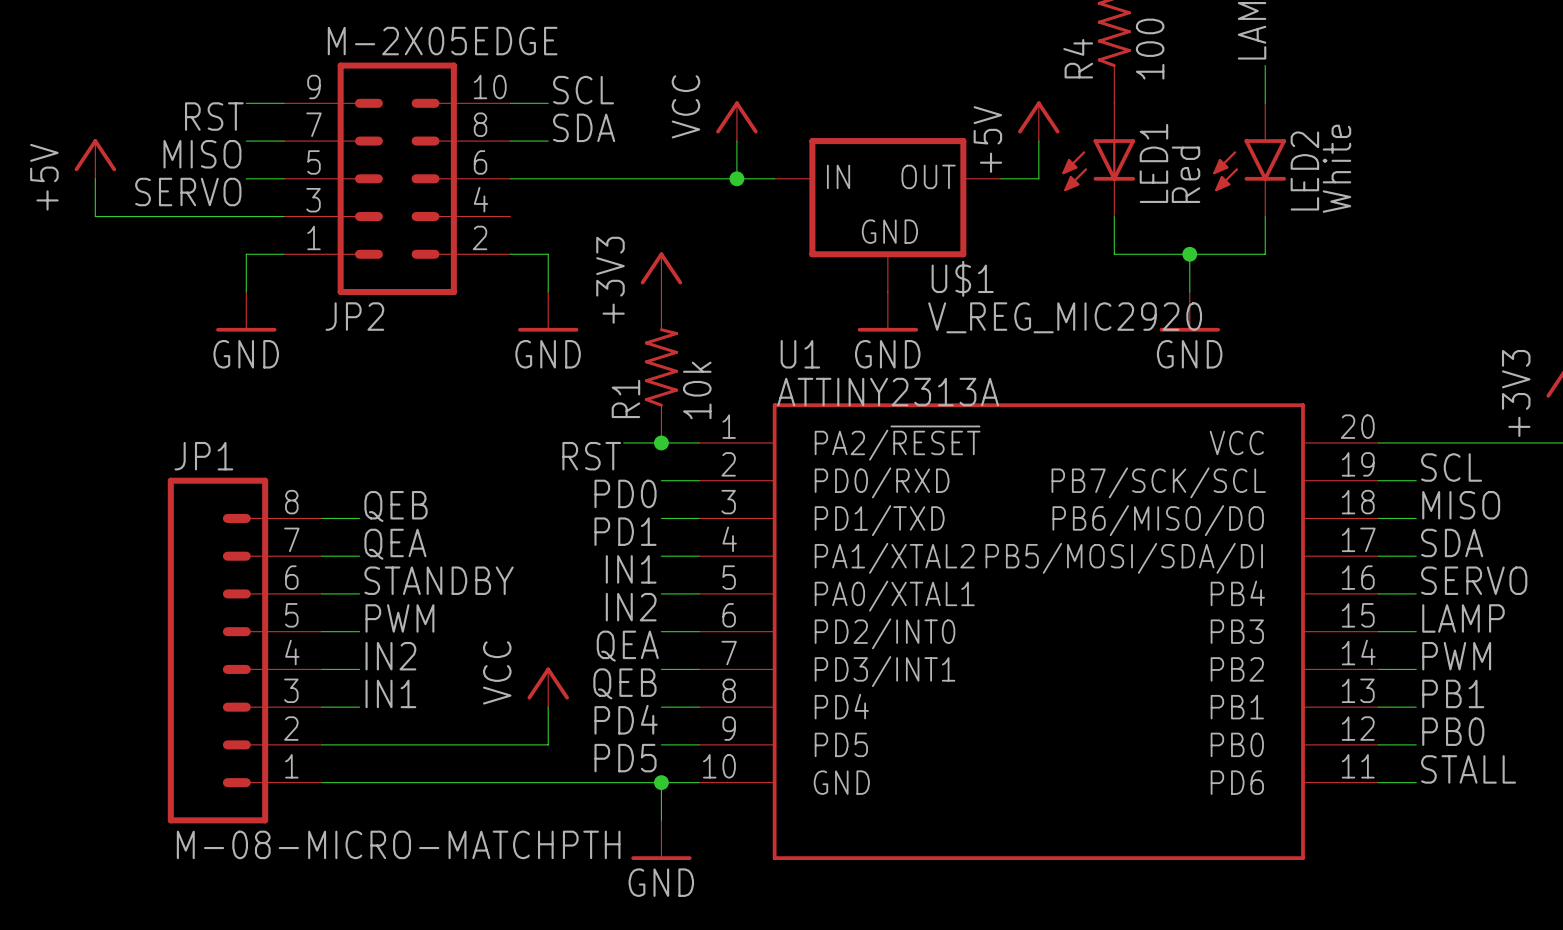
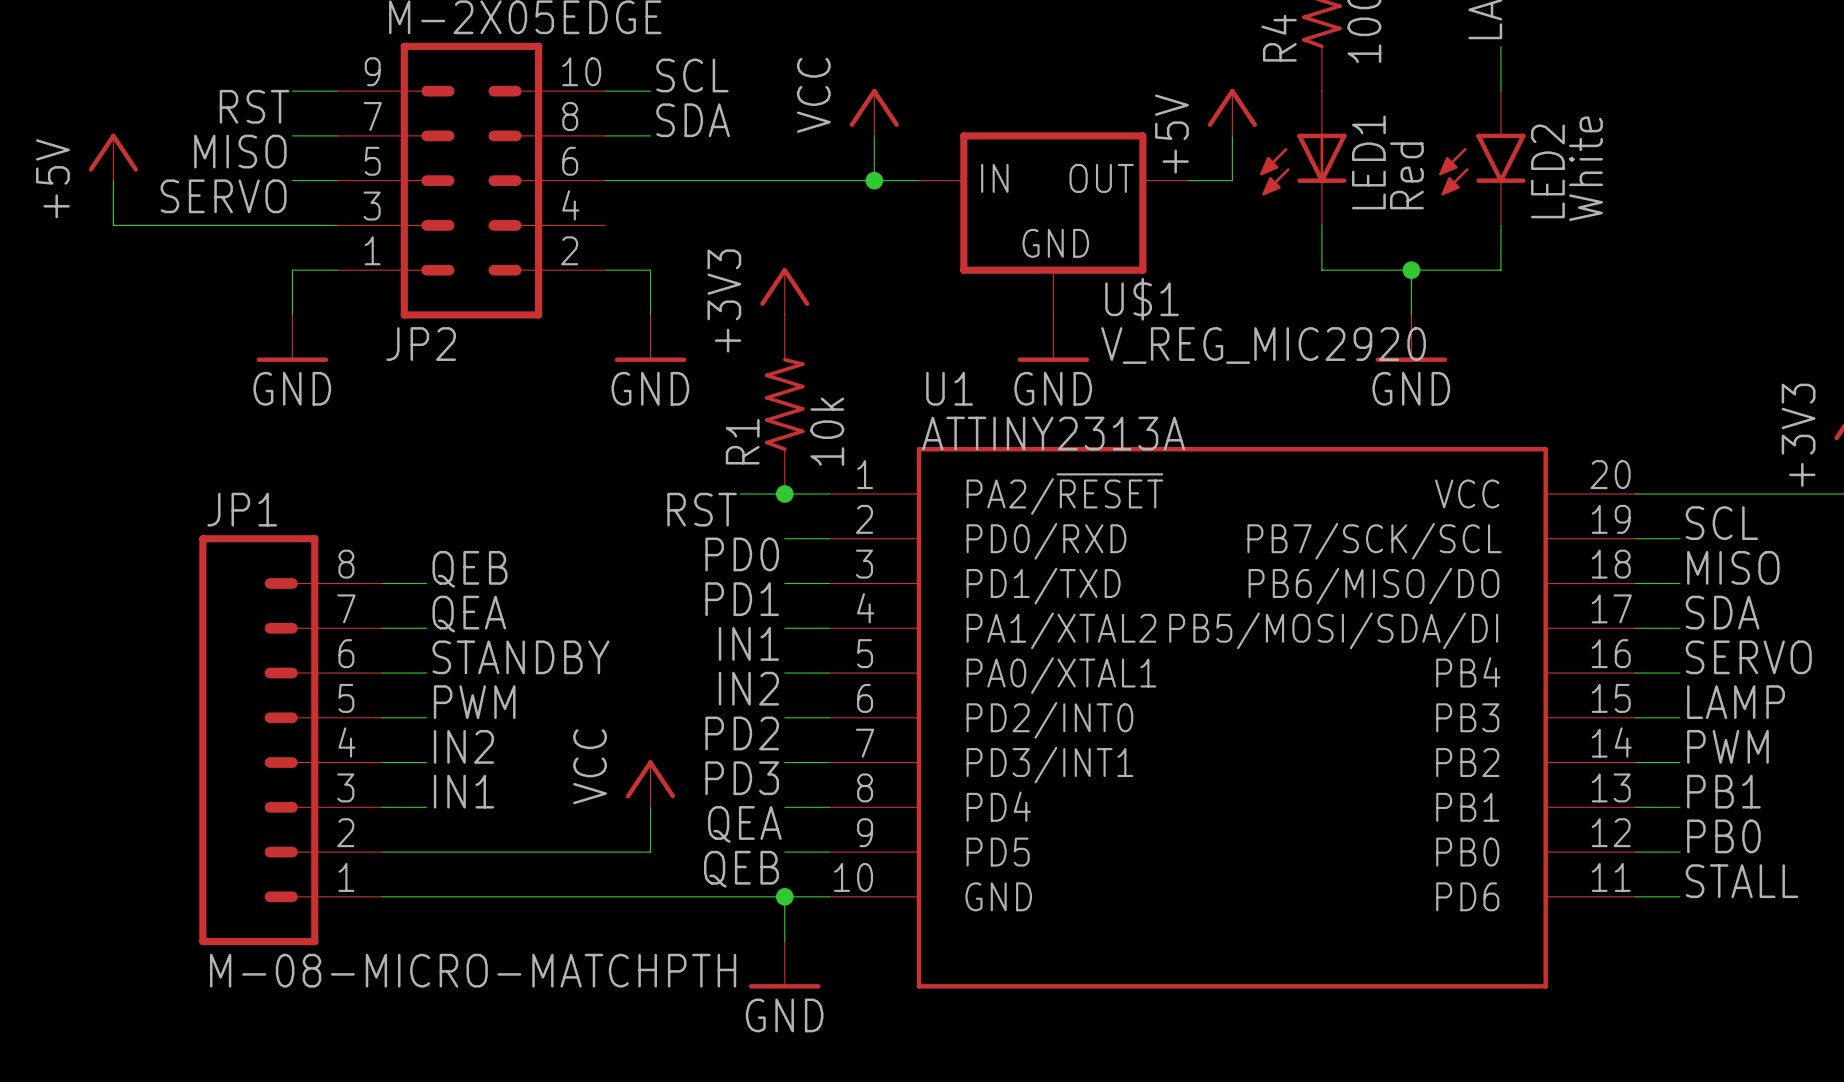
label: QEA (627, 646) -> PD2 (742, 733)
label: QEB (624, 683) -> PD3 (742, 778)
label: PD4 (626, 719) -> QEA (744, 824)
label: PD5 (625, 758) -> QEB (741, 869)

